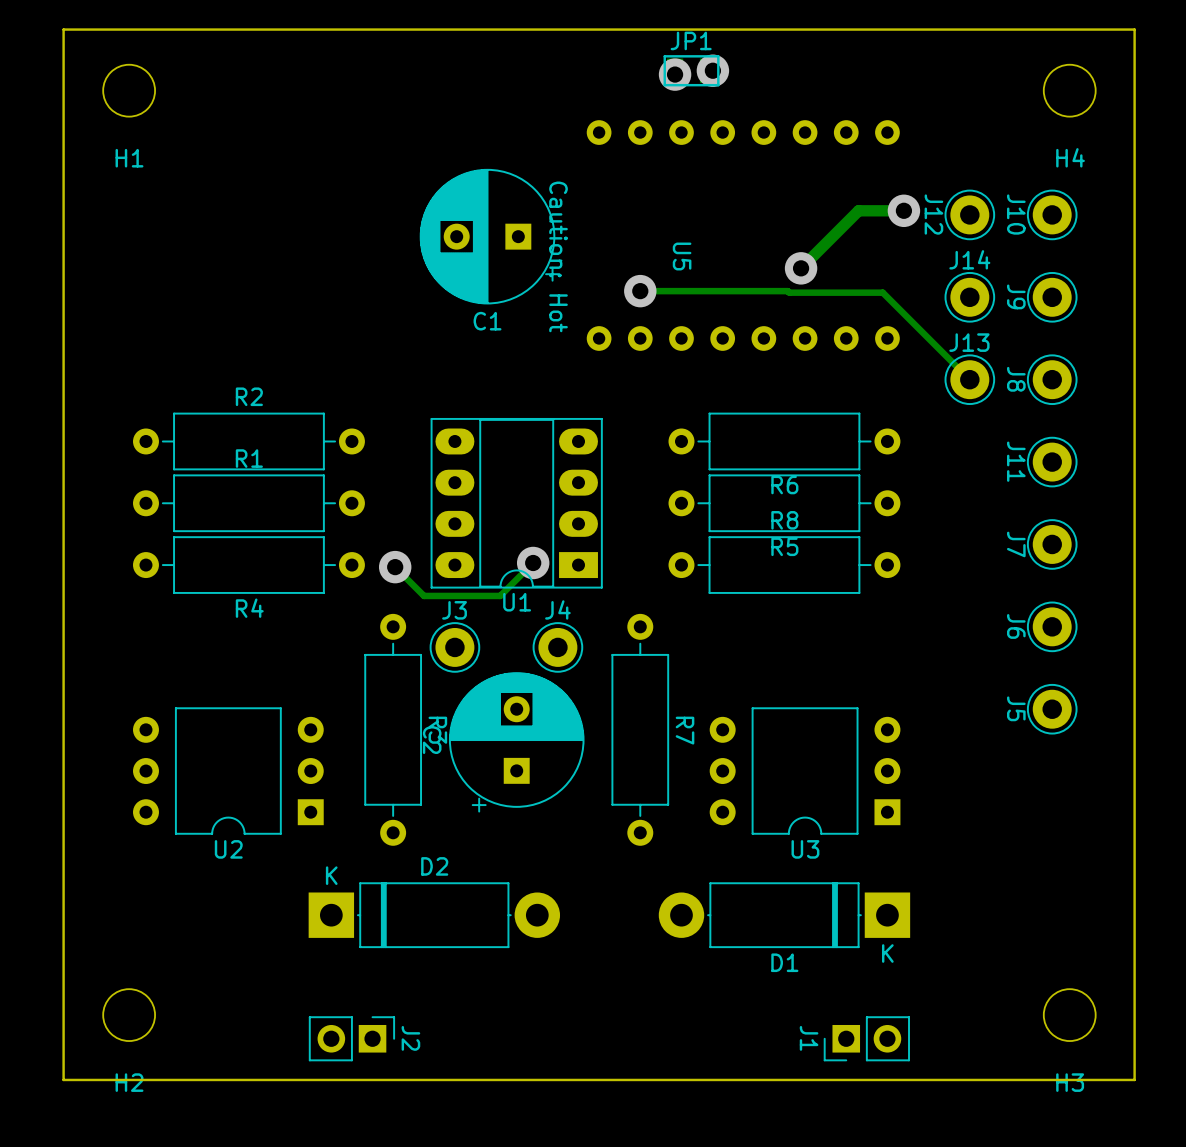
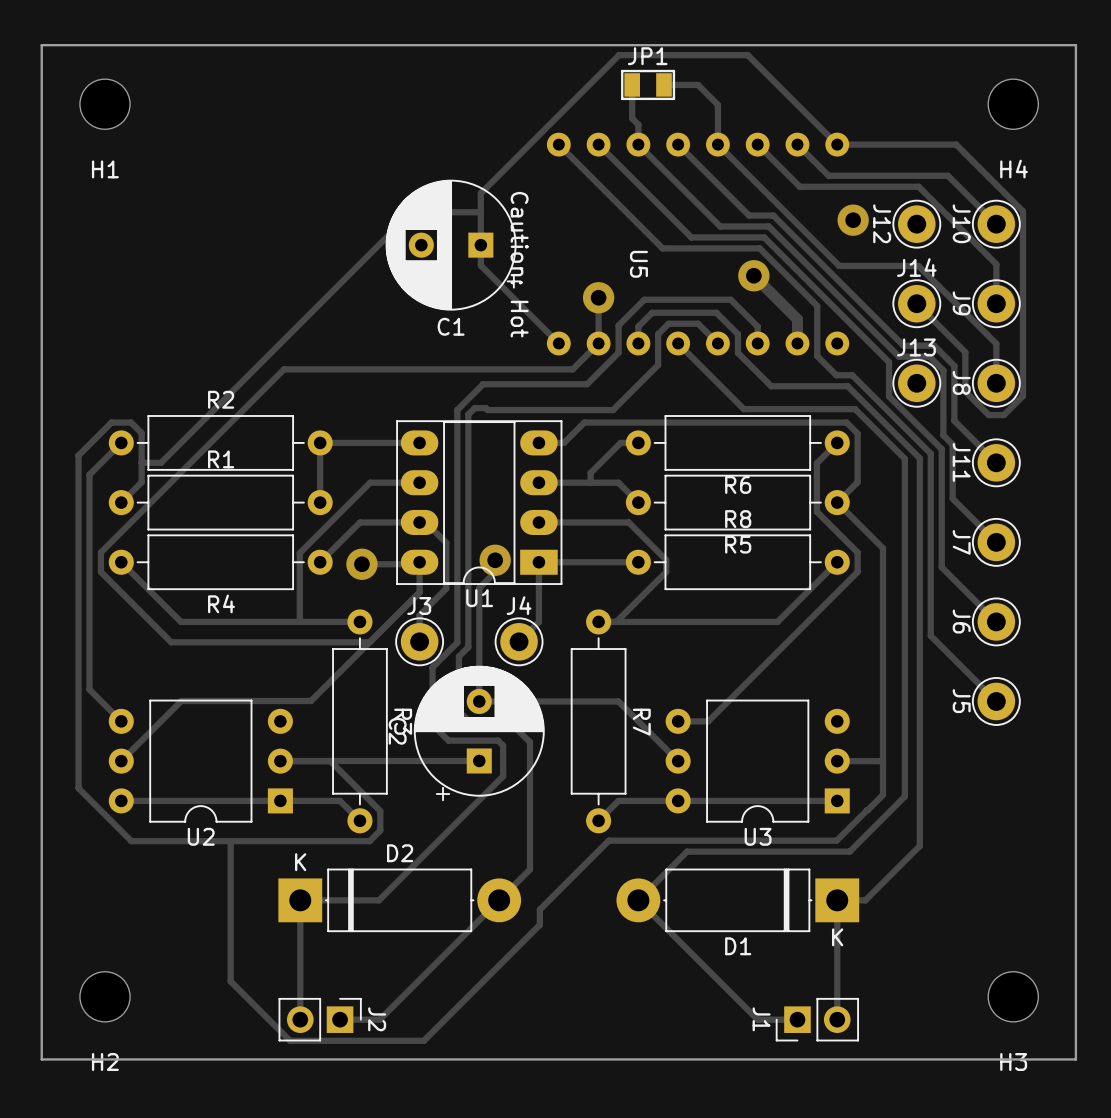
track: none -> (632, 84) (632, 118) (638, 124) (638, 144) (720, 226) (768, 226) (898, 356) (929, 356) (943, 370) (943, 435) (952, 444) (952, 498) (996, 542)
track: none -> (664, 84) (698, 84) (717, 104) (717, 144) (839, 265) (918, 265) (996, 343) (996, 383)
via: (712, 70) -> none
via: (675, 74) -> none
track: none -> (558, 144) (662, 248) (759, 248) (817, 305) (817, 356) (836, 375) (852, 375) (930, 453) (930, 635) (996, 701)
track: none -> (598, 144) (691, 237) (764, 237) (889, 362) (889, 396) (941, 449) (941, 567) (996, 621)
track: none -> (678, 144) (749, 215) (773, 215) (903, 345) (934, 345) (954, 365) (954, 420) (996, 462)
track: none -> (757, 144) (799, 186) (918, 186) (996, 264) (996, 303)
track: none -> (797, 144) (828, 175) (947, 175) (996, 224)
track: none -> (480, 212) (411, 212) (161, 462) (141, 462)
track: (903, 210) (858, 210) (801, 268) -> (797, 343) (797, 319) (753, 275)
track: (640, 291) (882, 292) (969, 379) -> (598, 297) (598, 343) (572, 369) (284, 369) (100, 552) (100, 572) (171, 642) (369, 642)
track: none -> (916, 303) (965, 352) (965, 391) (988, 415) (1003, 415) (1022, 396) (1022, 211) (956, 144) (837, 144) (747, 55) (619, 55) (480, 193) (480, 265) (558, 343)
track: none -> (638, 343) (638, 326) (652, 312) (716, 312) (737, 334) (737, 352) (771, 386) (847, 386) (919, 458) (919, 845) (865, 900) (837, 900) (837, 1019)
track: none -> (678, 343) (743, 409) (855, 409) (904, 458) (904, 796) (849, 851) (687, 851) (638, 900) (757, 1019) (797, 1019)
track: none -> (717, 343) (698, 323) (668, 323) (658, 334) (658, 365) (613, 410) (487, 410) (485, 408) (474, 408) (468, 414) (468, 647) (458, 656) (458, 711) (469, 721) (509, 721) (530, 742) (530, 869) (379, 1019) (340, 1019)
track: none -> (757, 343) (757, 326) (730, 299) (644, 299) (618, 325) (618, 352) (587, 384) (483, 384) (457, 409) (457, 642) (432, 667) (432, 724) (448, 740) (498, 740) (503, 745) (503, 776) (379, 900) (300, 900) (300, 1019)
track: none -> (121, 442) (89, 474) (89, 689) (121, 721)
track: none -> (419, 442) (320, 442) (320, 502)
track: none -> (538, 442) (563, 442) (584, 422) (846, 422) (857, 433) (857, 482) (837, 502) (883, 548) (883, 794) (836, 840) (608, 840) (539, 909) (539, 924) (423, 1040) (290, 1040) (230, 981) (230, 841)
track: none -> (638, 442) (620, 442) (590, 472) (590, 482)
track: none -> (837, 442) (816, 463) (816, 511) (857, 552) (857, 572) (708, 721) (678, 721)
track: none -> (419, 482) (370, 482) (299, 553) (300, 621)
track: none -> (538, 482) (618, 482) (638, 502)
track: none -> (121, 502) (141, 482) (141, 433) (131, 422) (111, 422) (78, 455) (78, 788) (131, 841) (369, 841) (380, 830) (380, 811) (330, 761) (280, 761)
track: none -> (538, 522) (628, 522) (666, 559) (666, 572) (616, 621)
track: (533, 563) (500, 595) (424, 595) (395, 567) -> (495, 560) (495, 572) (479, 588) (479, 701) (618, 701) (678, 761)
track: none -> (121, 562) (180, 621) (359, 621)
track: none -> (320, 562) (359, 522) (425, 522) (446, 542) (446, 588) (419, 615) (419, 641)
track: none -> (638, 562) (538, 562) (538, 621) (519, 641)
track: none -> (837, 562) (777, 621) (598, 621)
track: none -> (361, 564) (417, 564) (419, 562) (419, 592) (311, 701) (181, 701) (121, 761)
track: none -> (479, 760) (280, 760)
track: none -> (883, 761) (837, 761)
track: none -> (121, 800) (340, 800) (359, 820)
track: none -> (837, 800) (618, 800) (598, 820)

